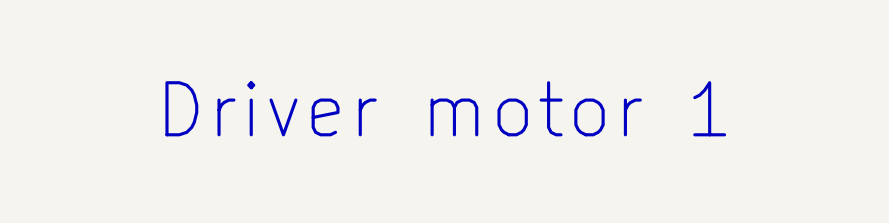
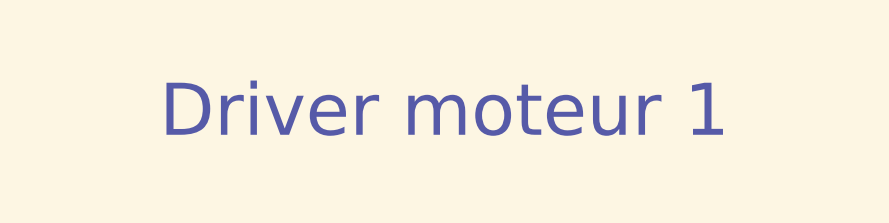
text: Driver motor 1 (445, 108) -> Driver moteur 1 (444, 108)

